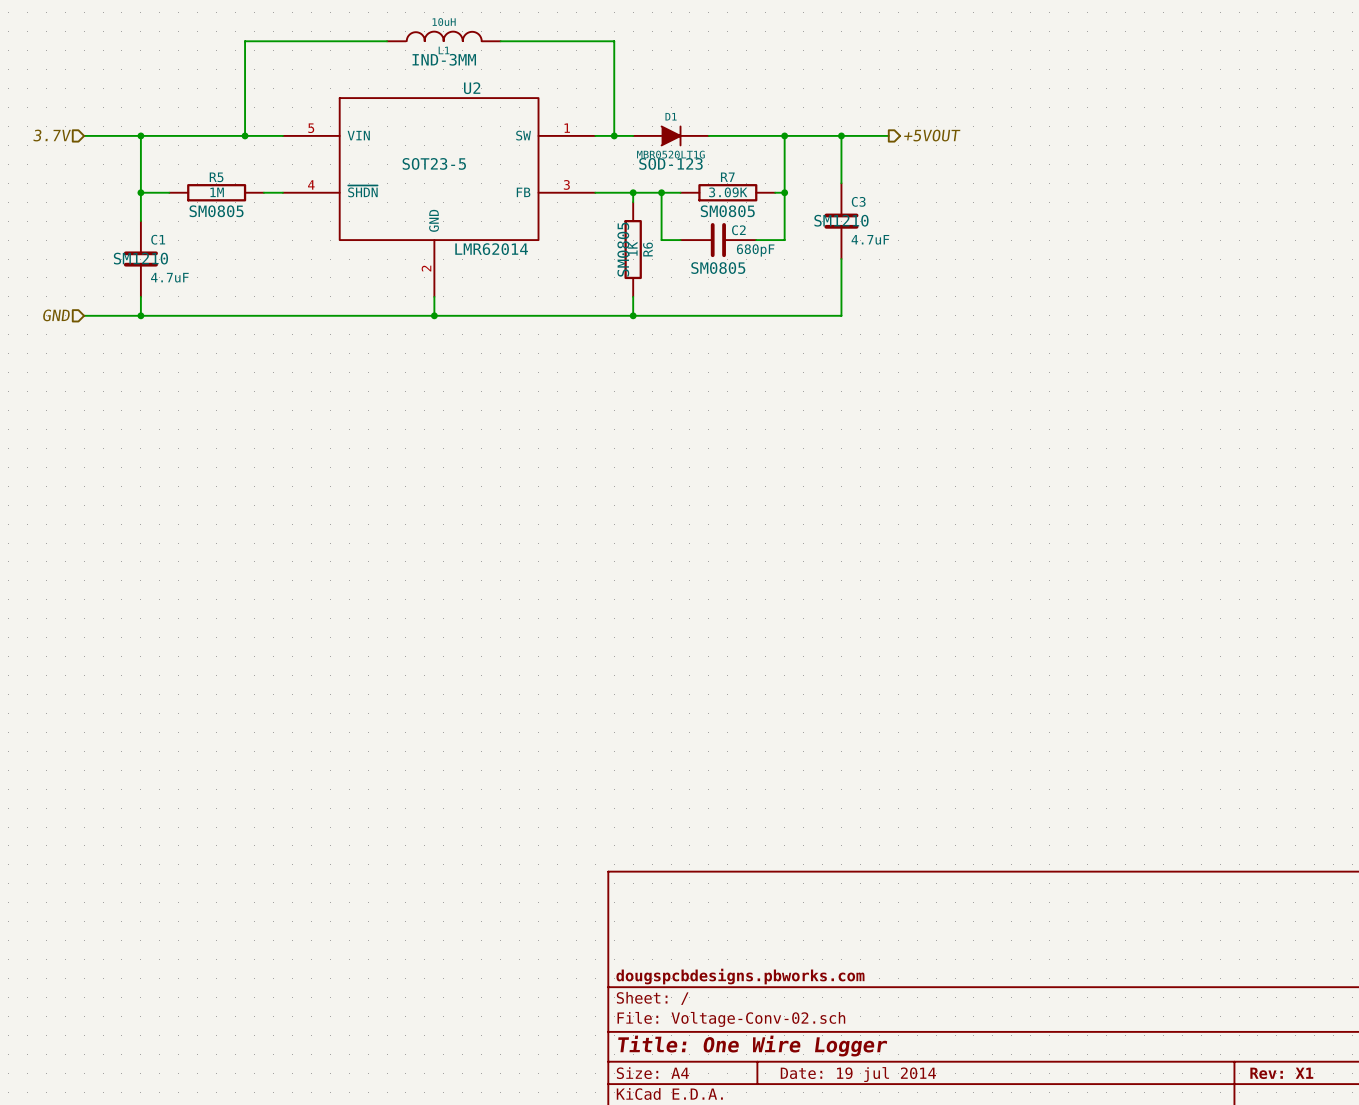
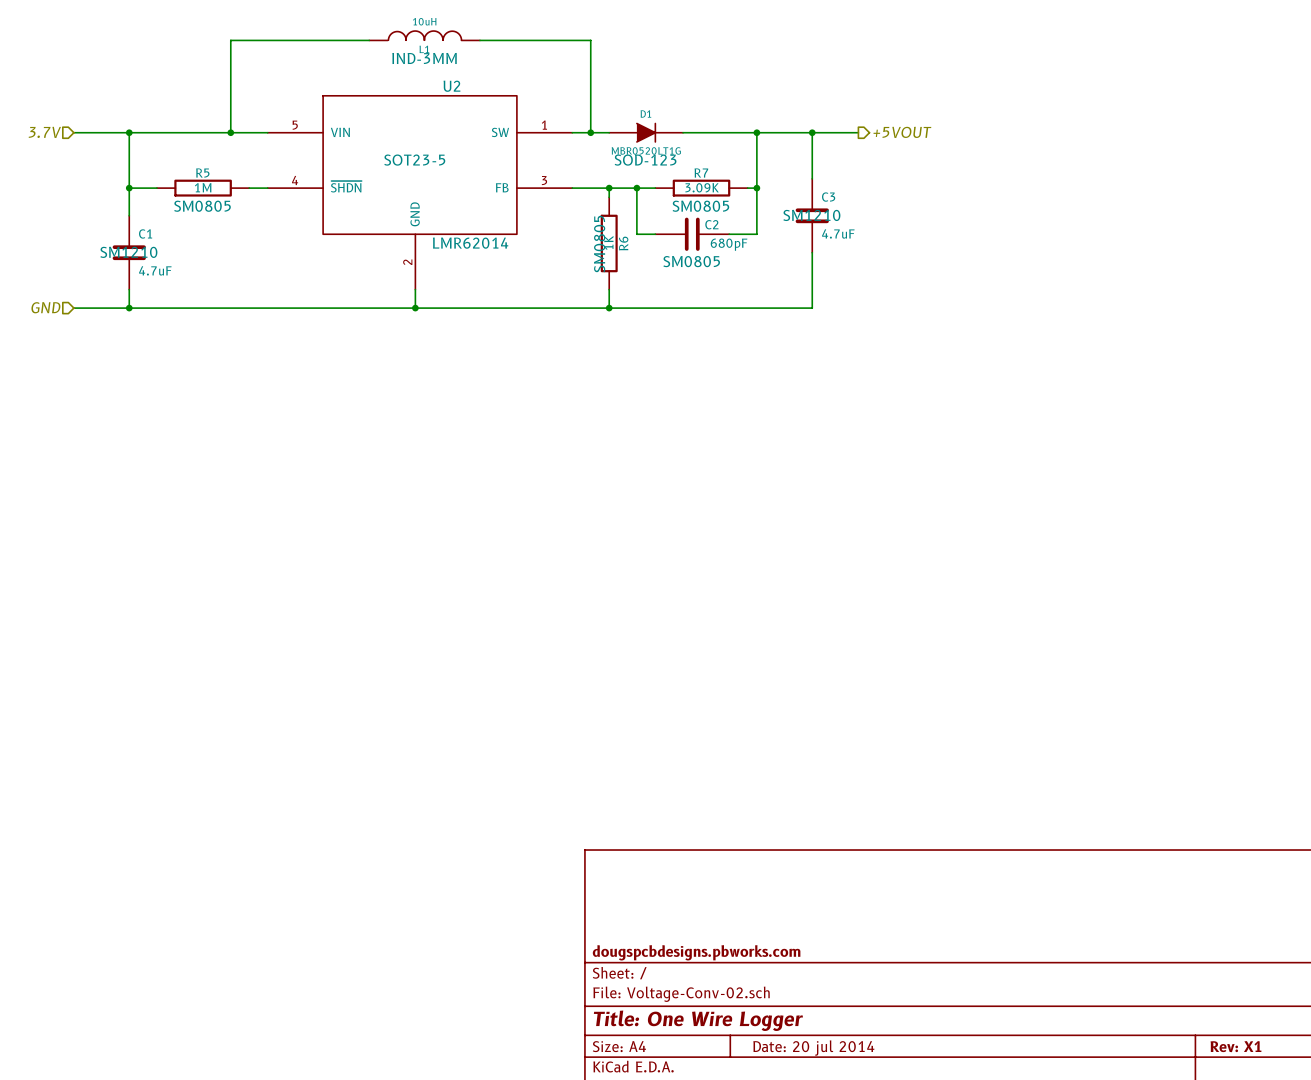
title block: Date: 19 jul 2014 (858, 1074) -> Date: 20 jul 2014 (813, 1048)

